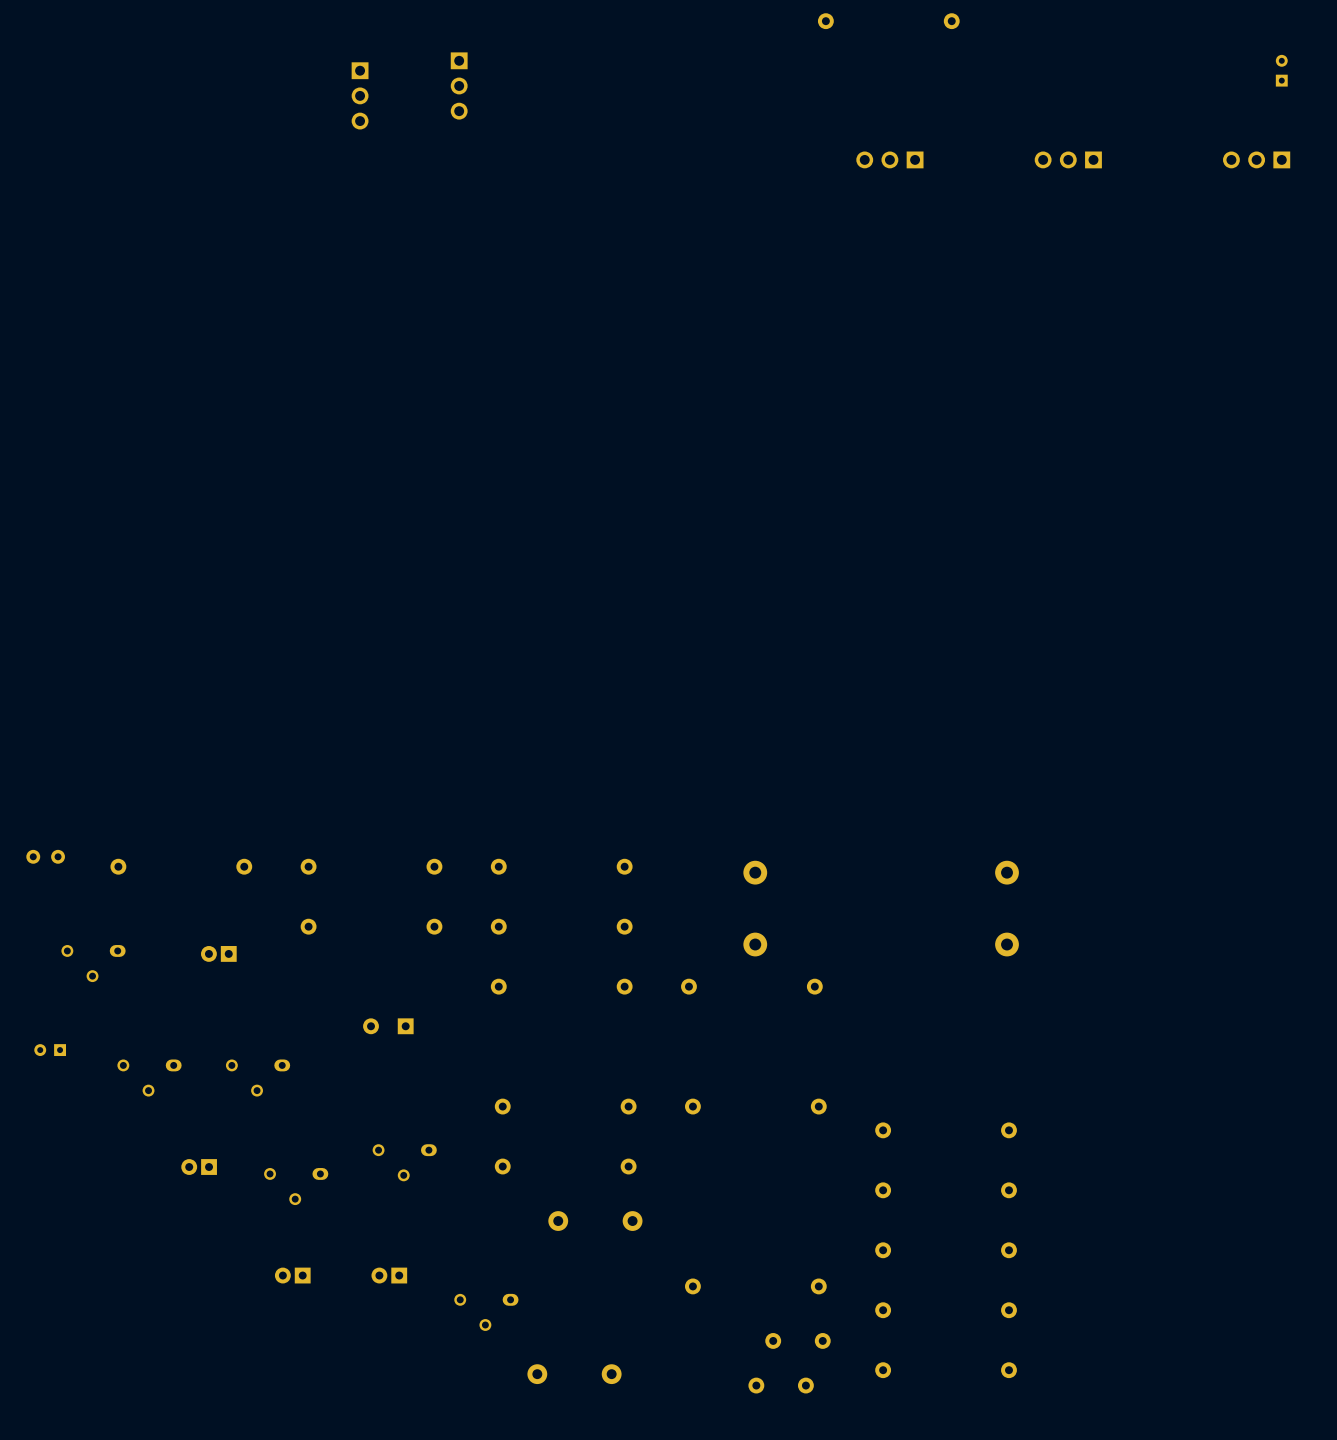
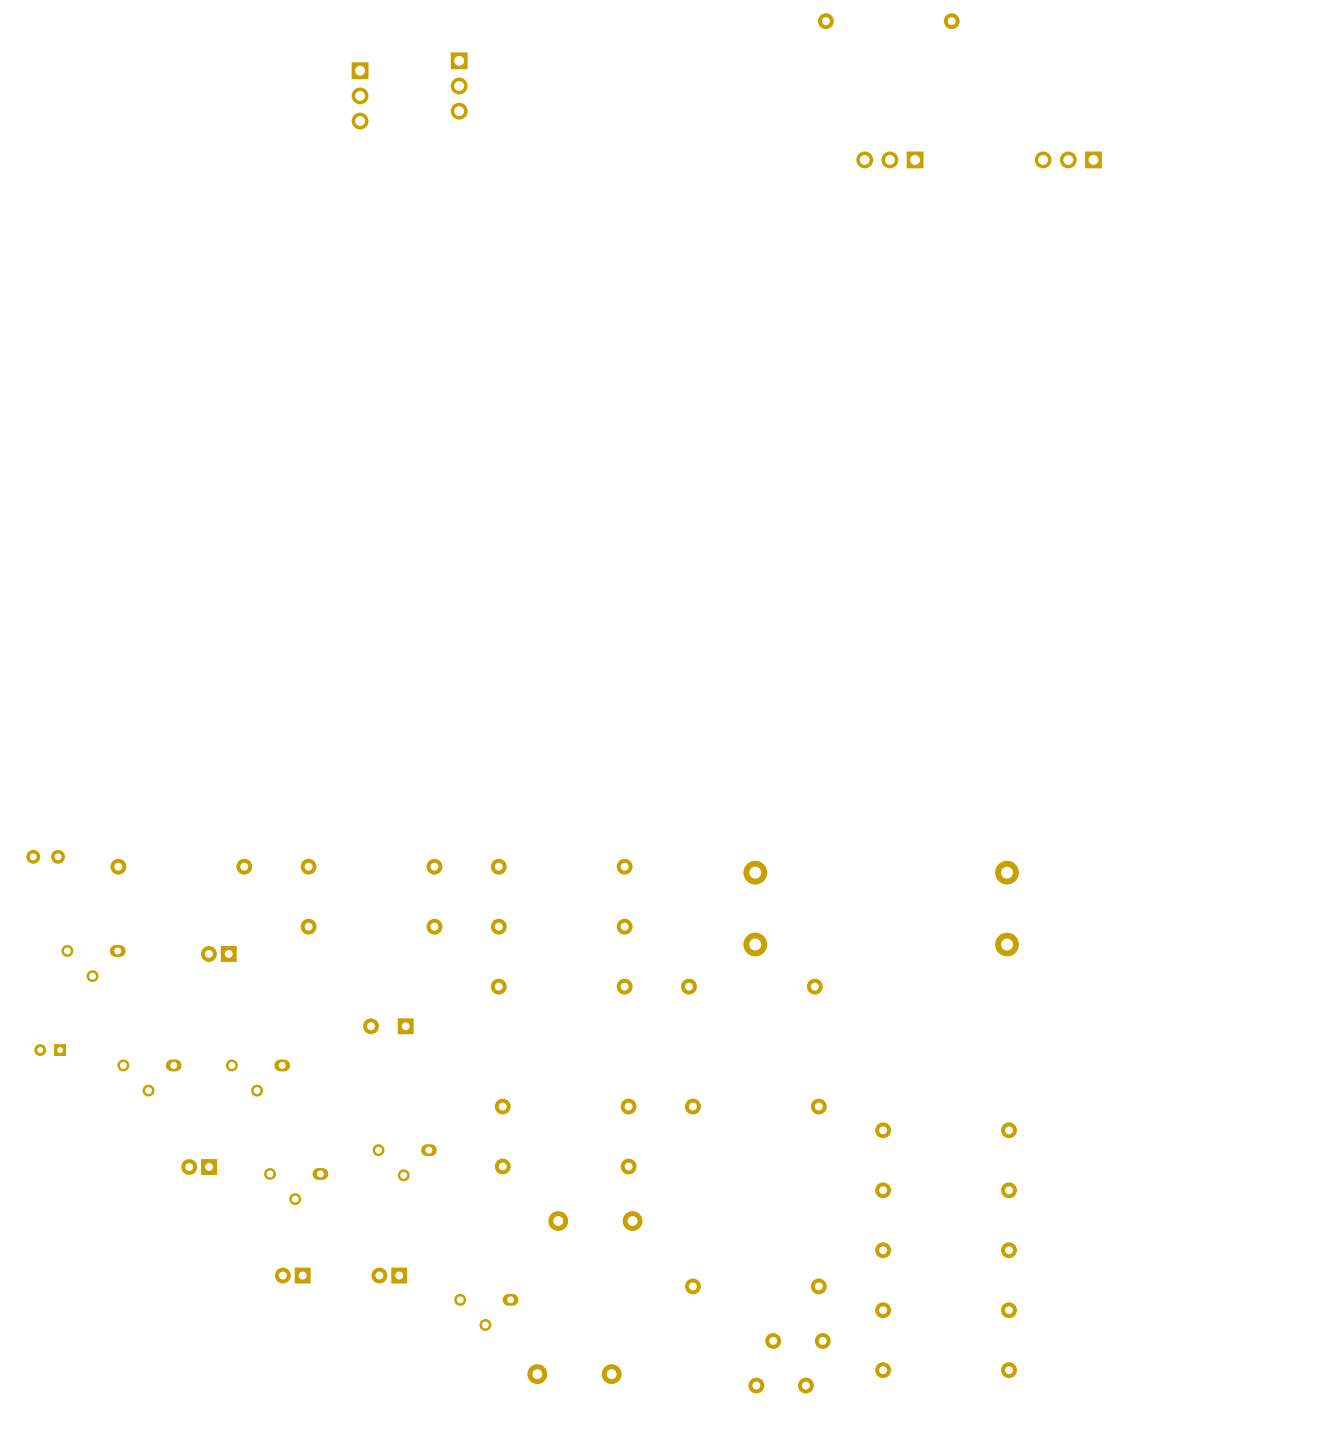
part: (1281, 70) -> none
part: (1256, 159) -> none

